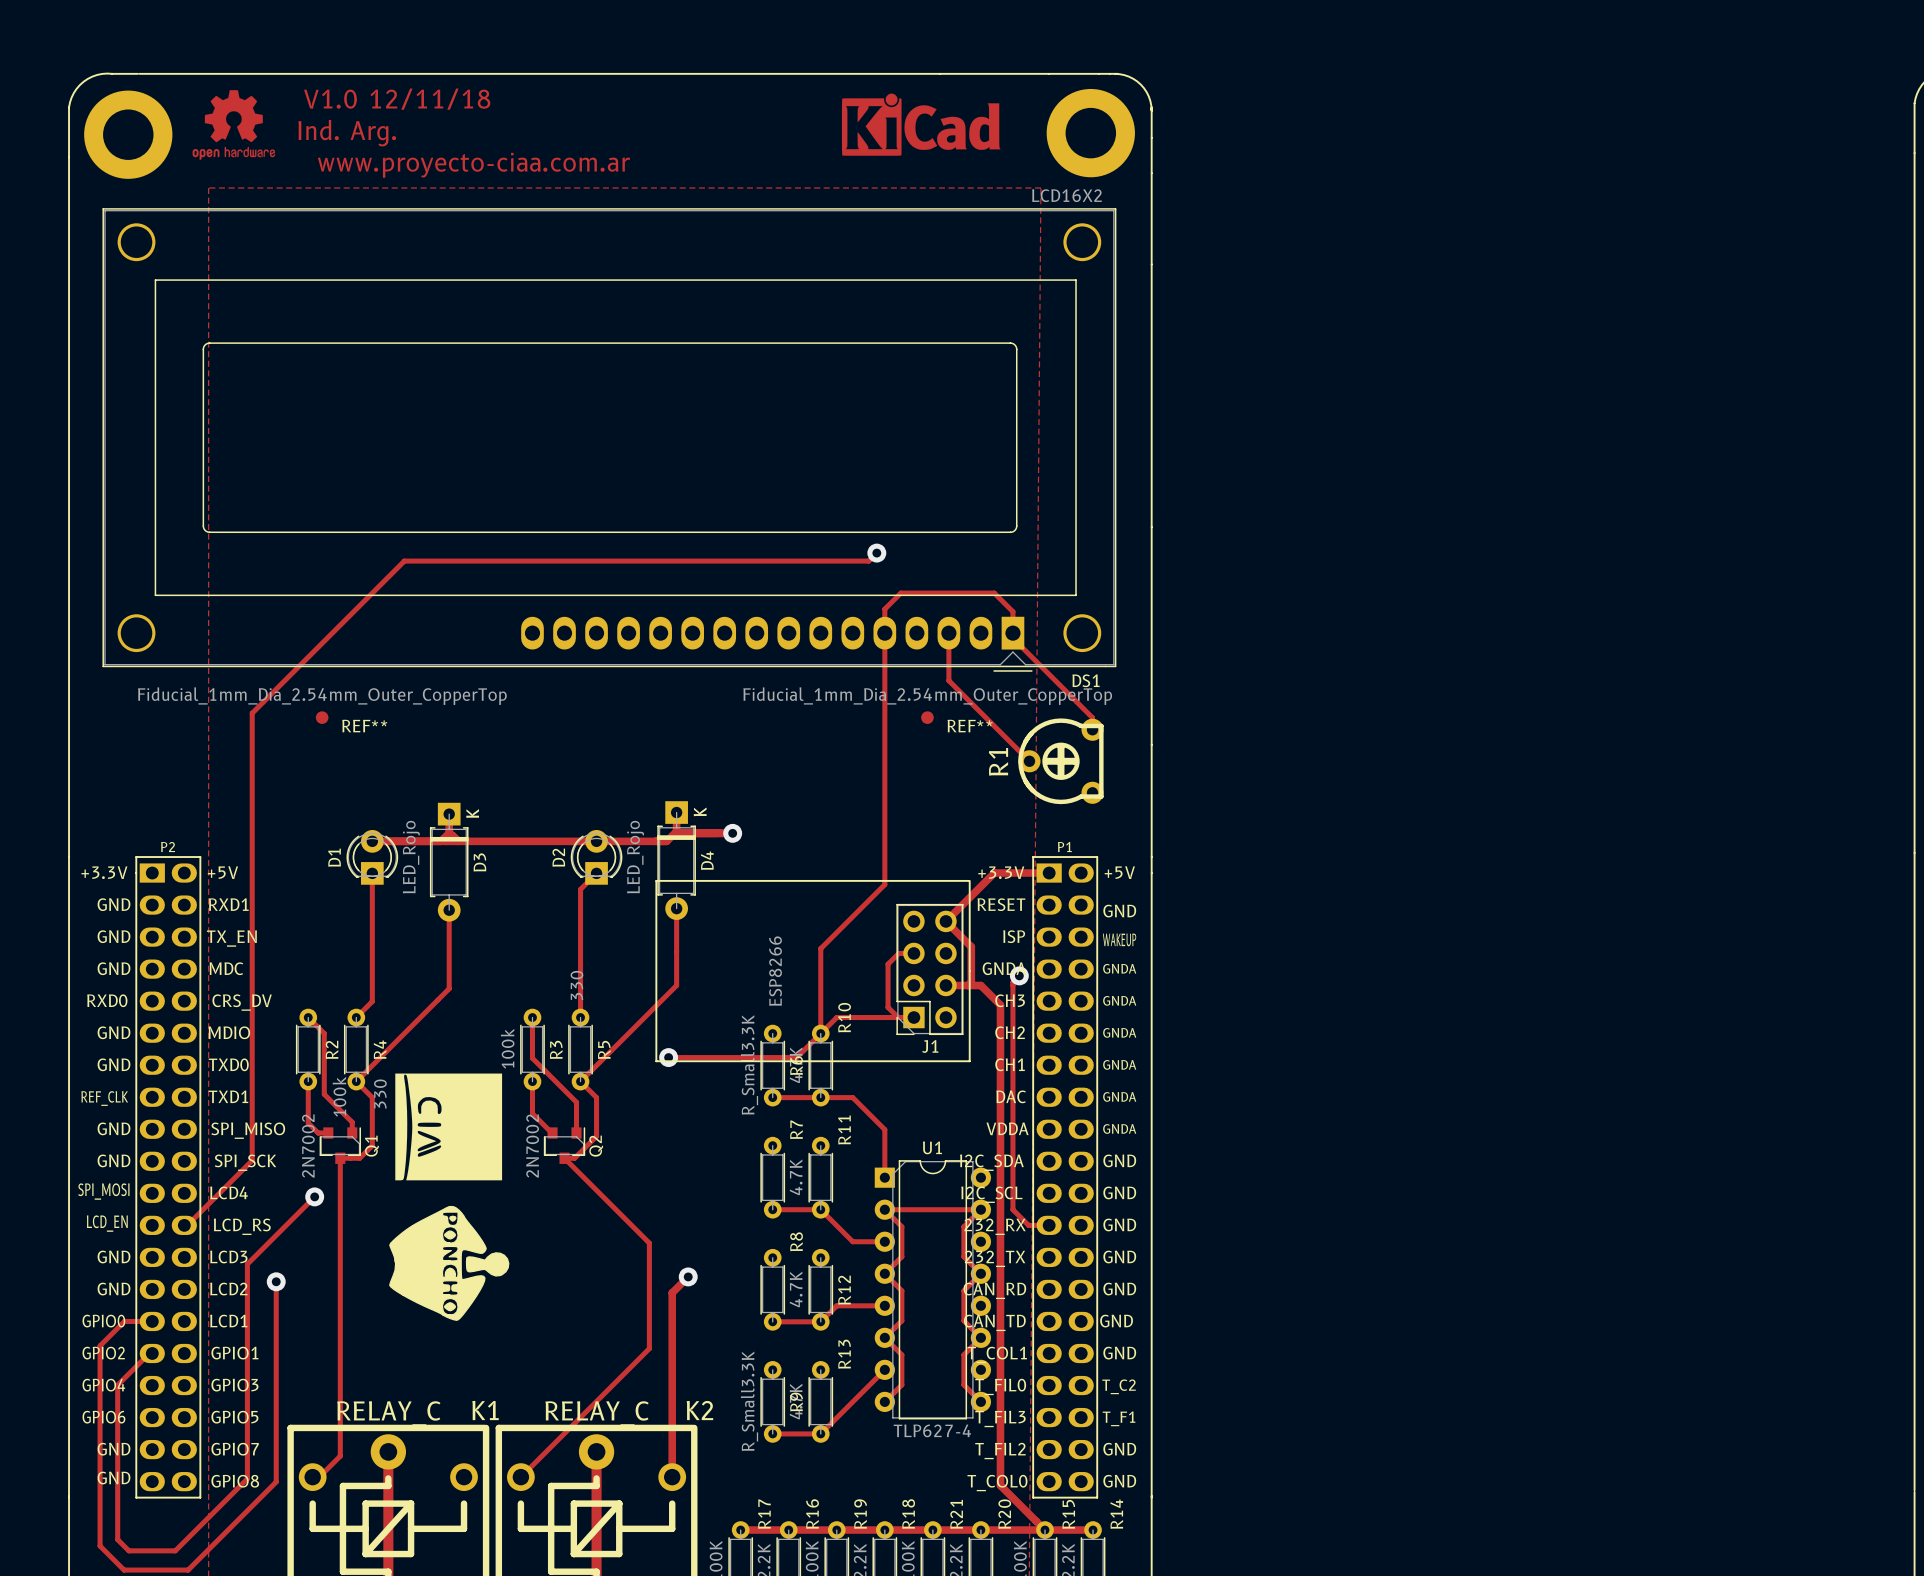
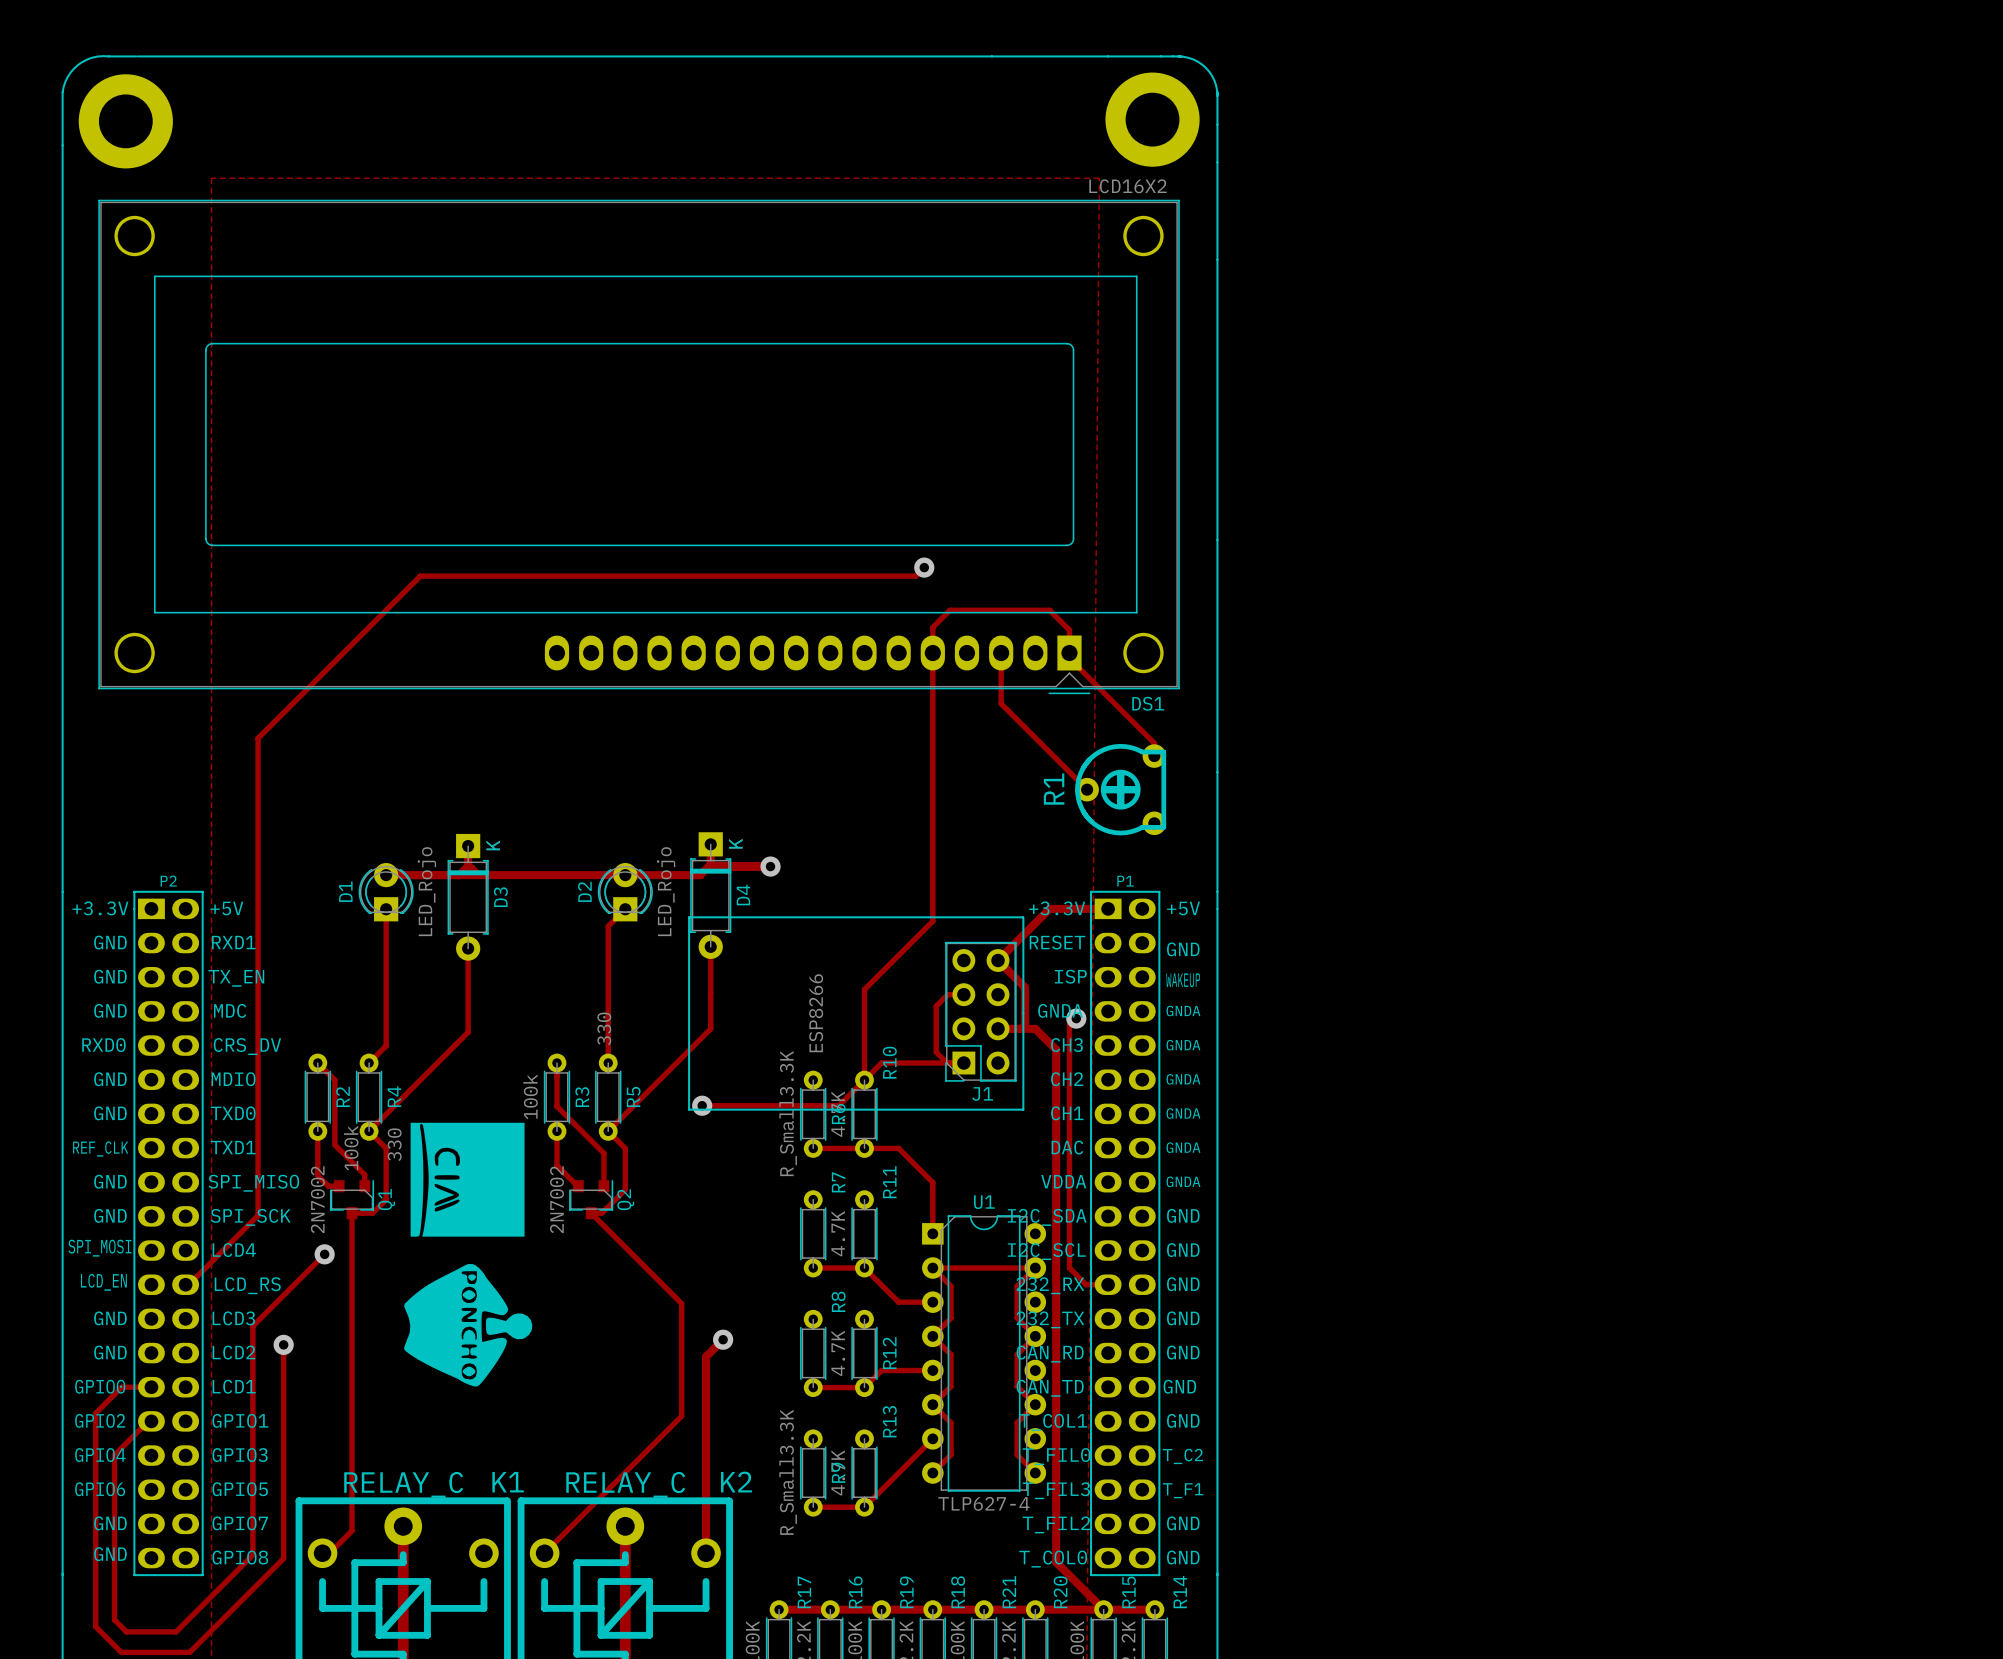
drawing: [192, 90, 276, 160] -> none
drawing: [841, 93, 1001, 156] -> none
text: V1.0 12/11/18 (397, 99) -> none
text: Ind. Arg. (347, 133) -> none
text: www.proyecto-ciaa.com.ar (473, 165) -> none
REF**: Fiducial_1mm_Dia_2.54mm_Outer_CopperTop (322, 717) -> none
REF**: Fiducial_1mm_Dia_2.54mm_Outer_CopperTop (927, 717) -> none

